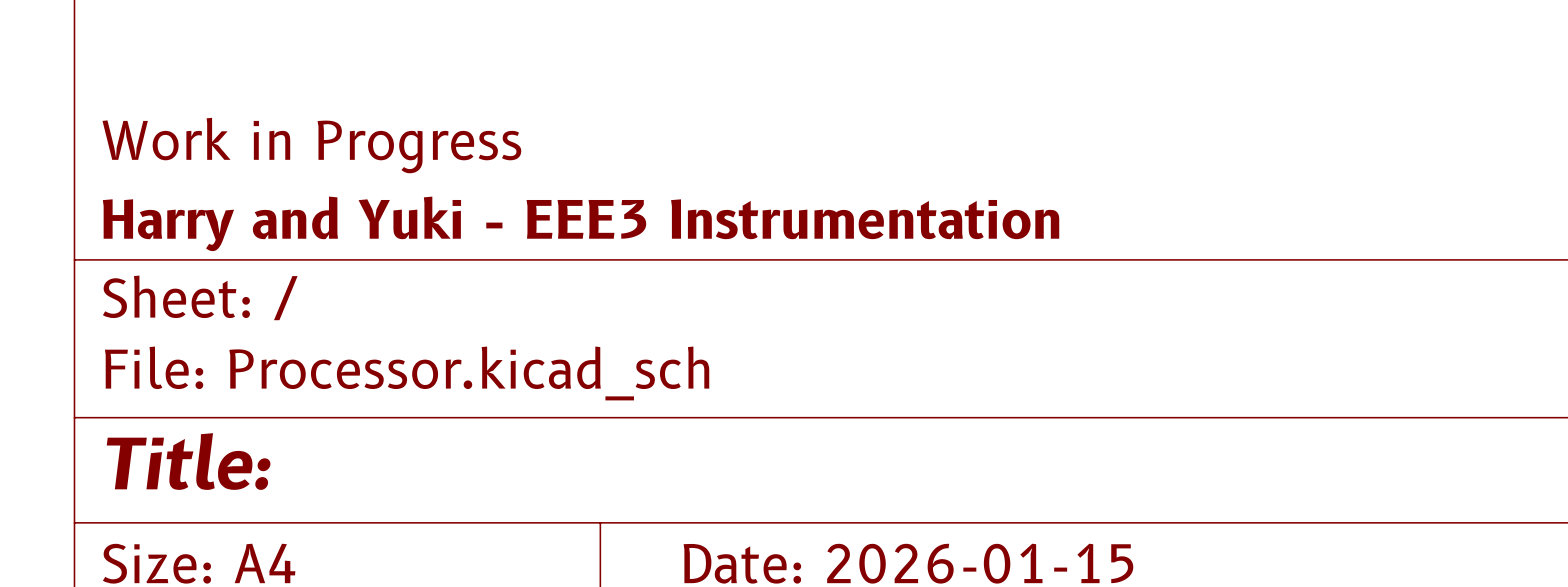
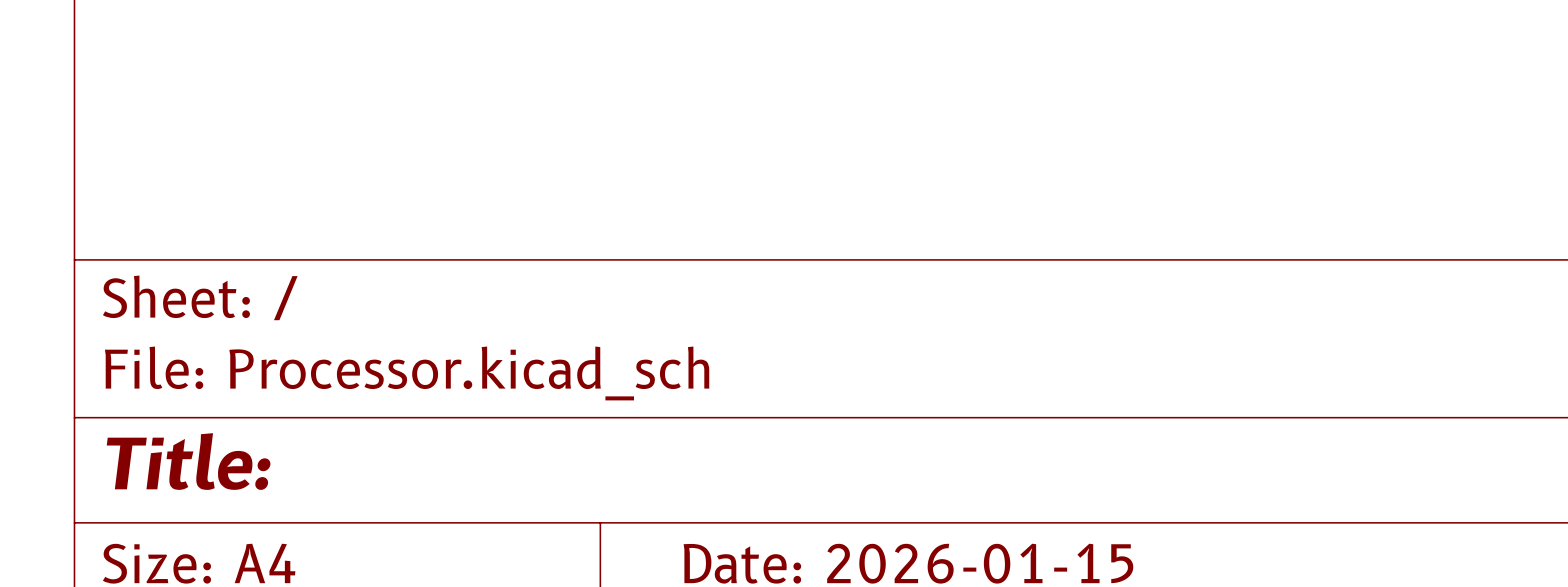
title block: Work in Progress (311, 145) -> none
title block: Harry and Yuki - EEE3 Instrumentation (581, 223) -> none

